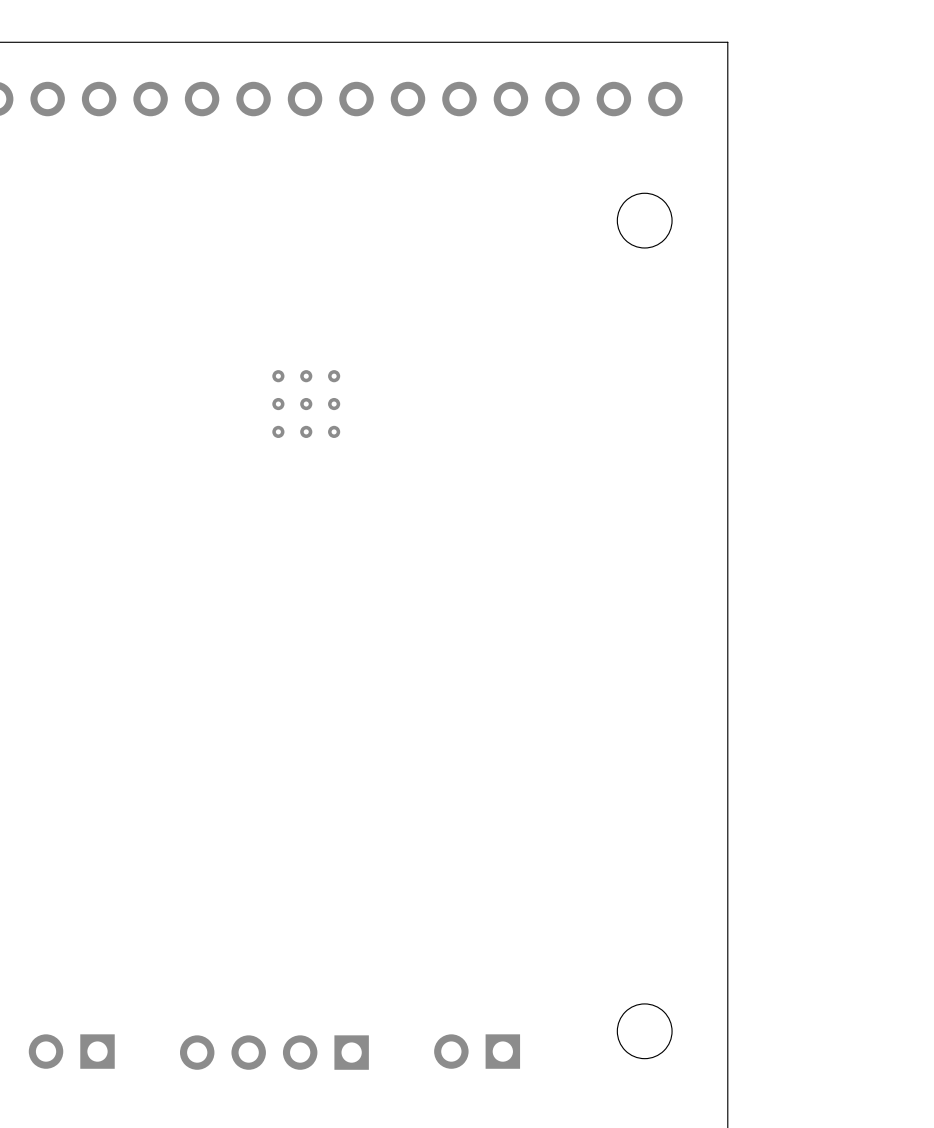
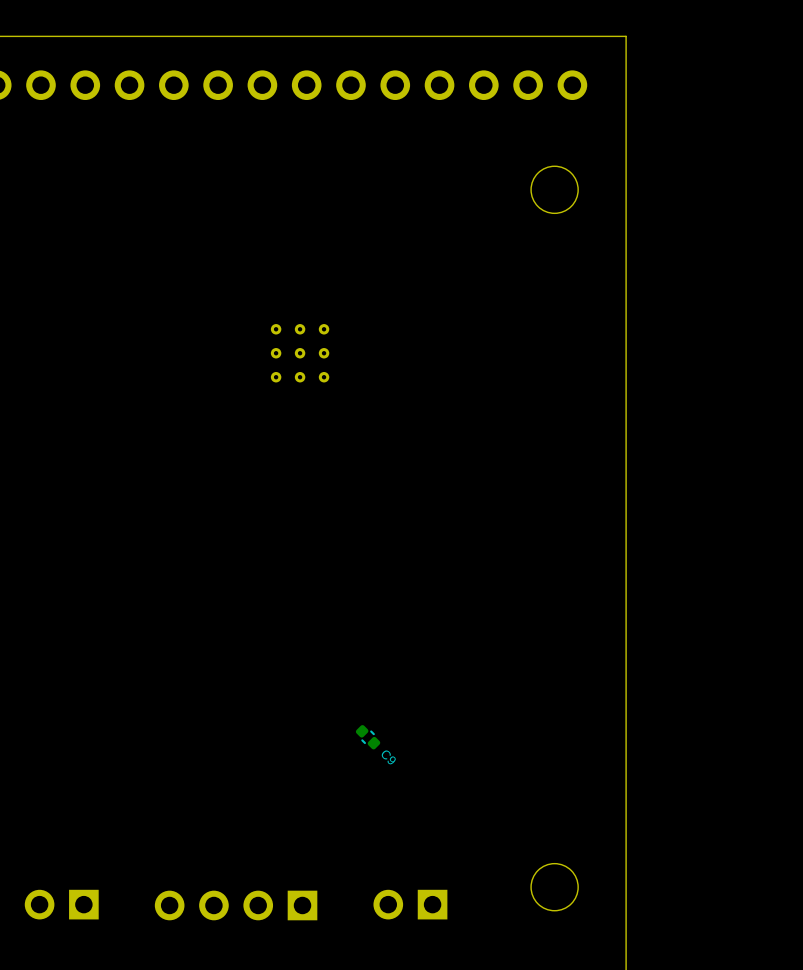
part position: (306, 404) -> (300, 353)
C9: none -> (368, 737)

